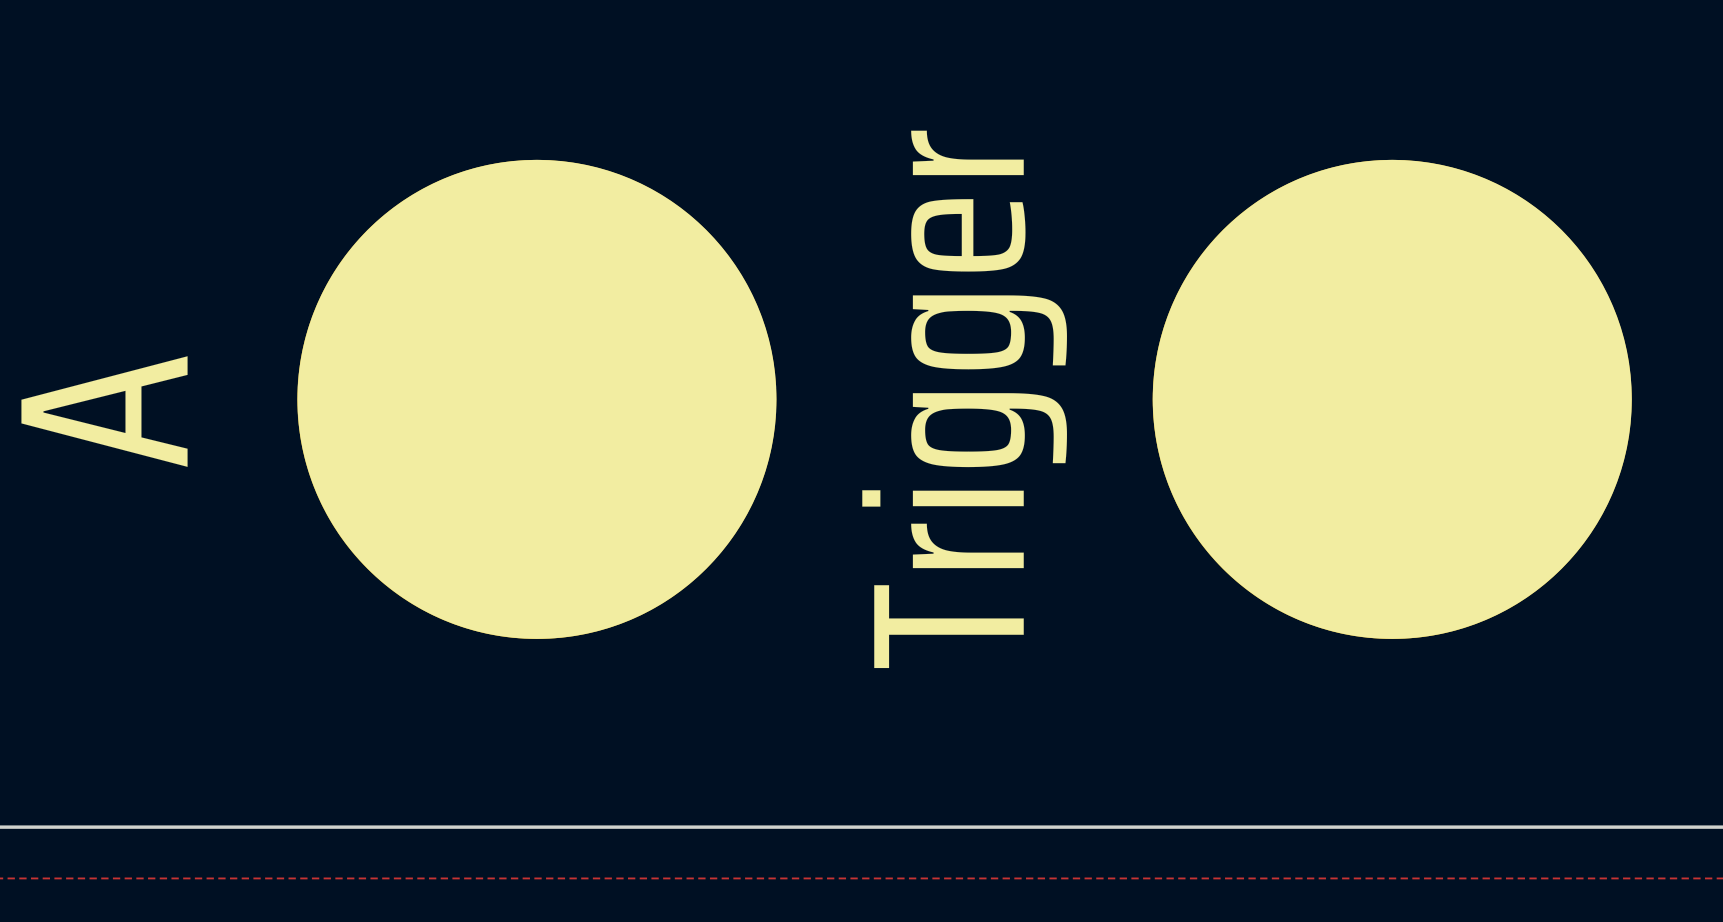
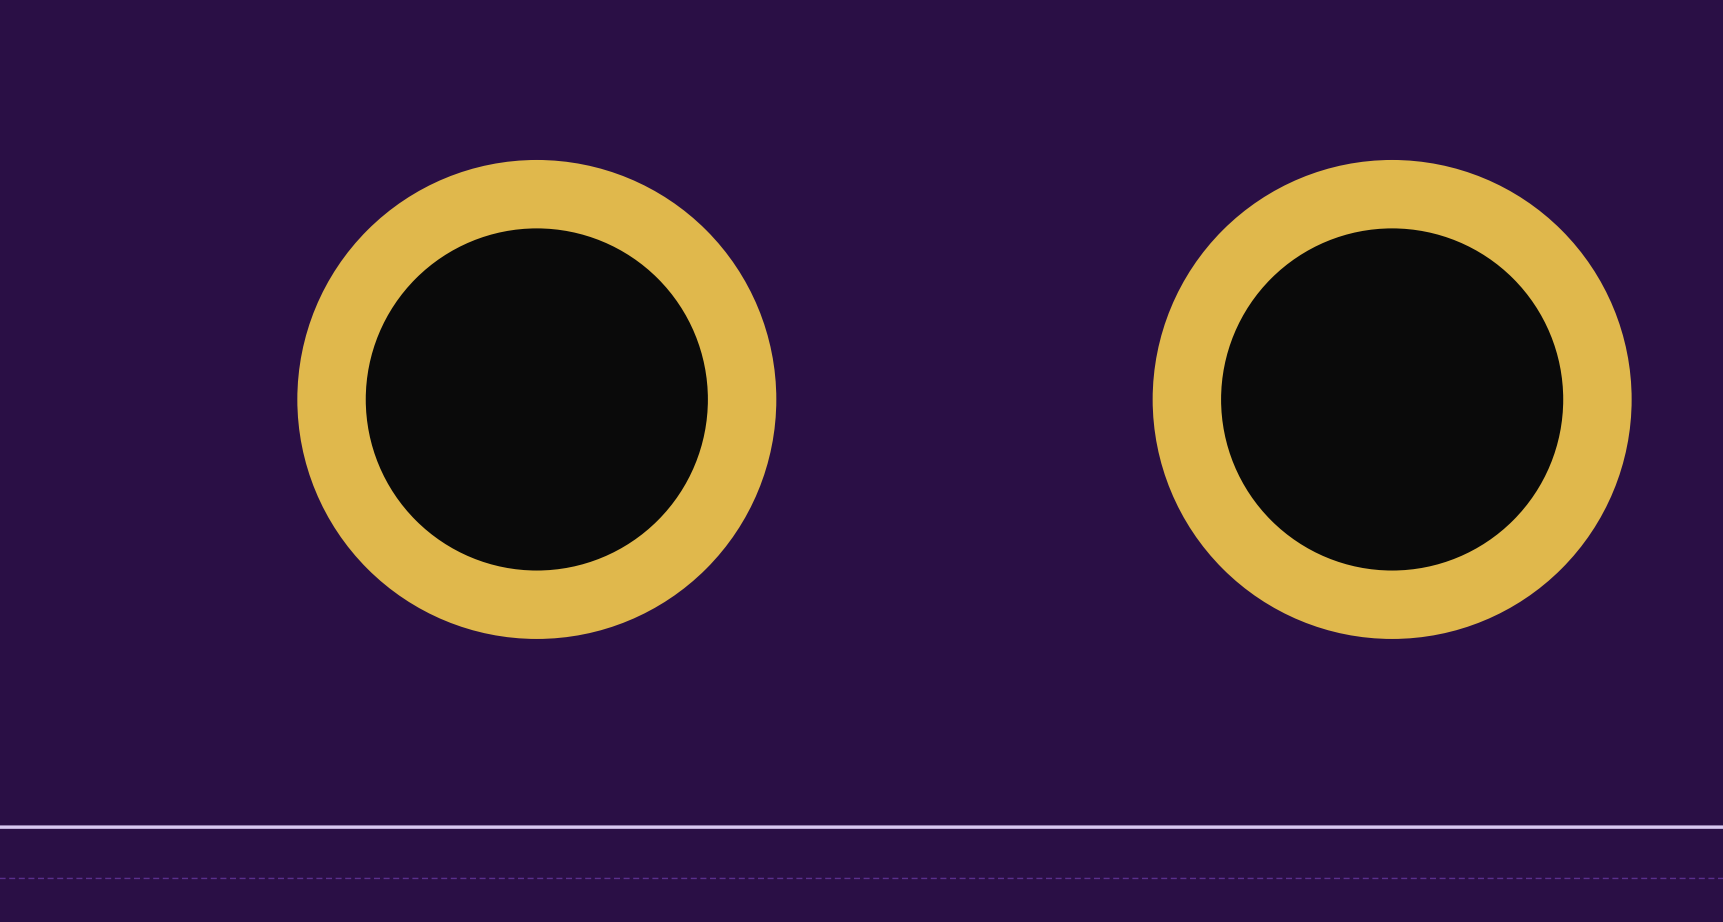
drawing: [862, 130, 1067, 669] -> none
drawing: [297, 159, 777, 639] -> none
drawing: [1152, 159, 1632, 639] -> none
drawing: [21, 356, 188, 467] -> none

